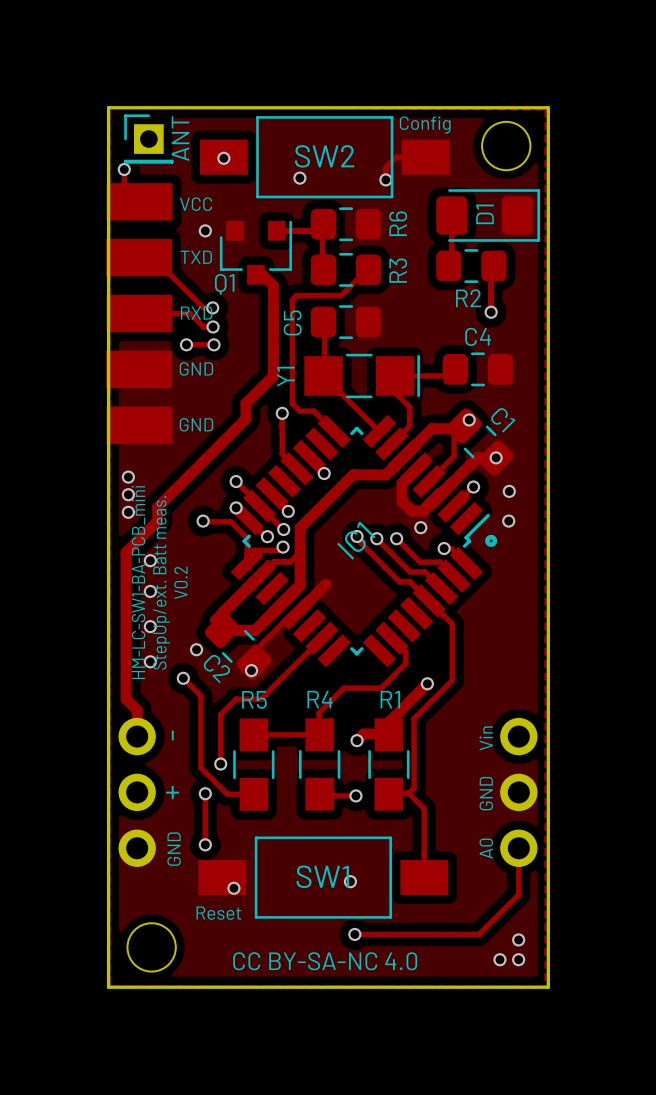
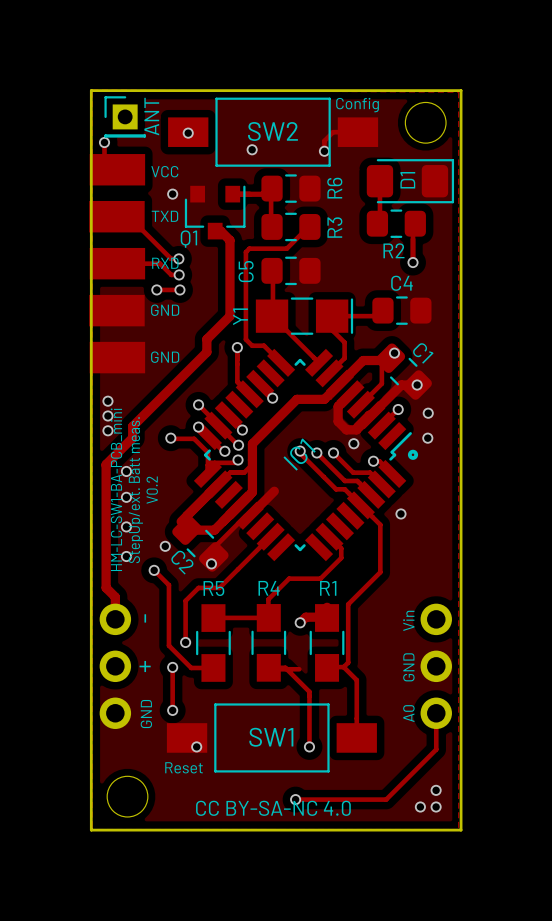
track: (427, 683) (388, 722) -> none
via position: (427, 683) -> (400, 513)
track: none -> (280, 667) (285, 667) (309, 691) (309, 746)
via: (355, 795) -> none
via position: (350, 881) -> (309, 746)
track: (518, 891) (518, 894) (479, 934) (354, 934) -> (436, 749) (386, 799) (295, 799)
via position: (354, 934) -> (295, 799)

